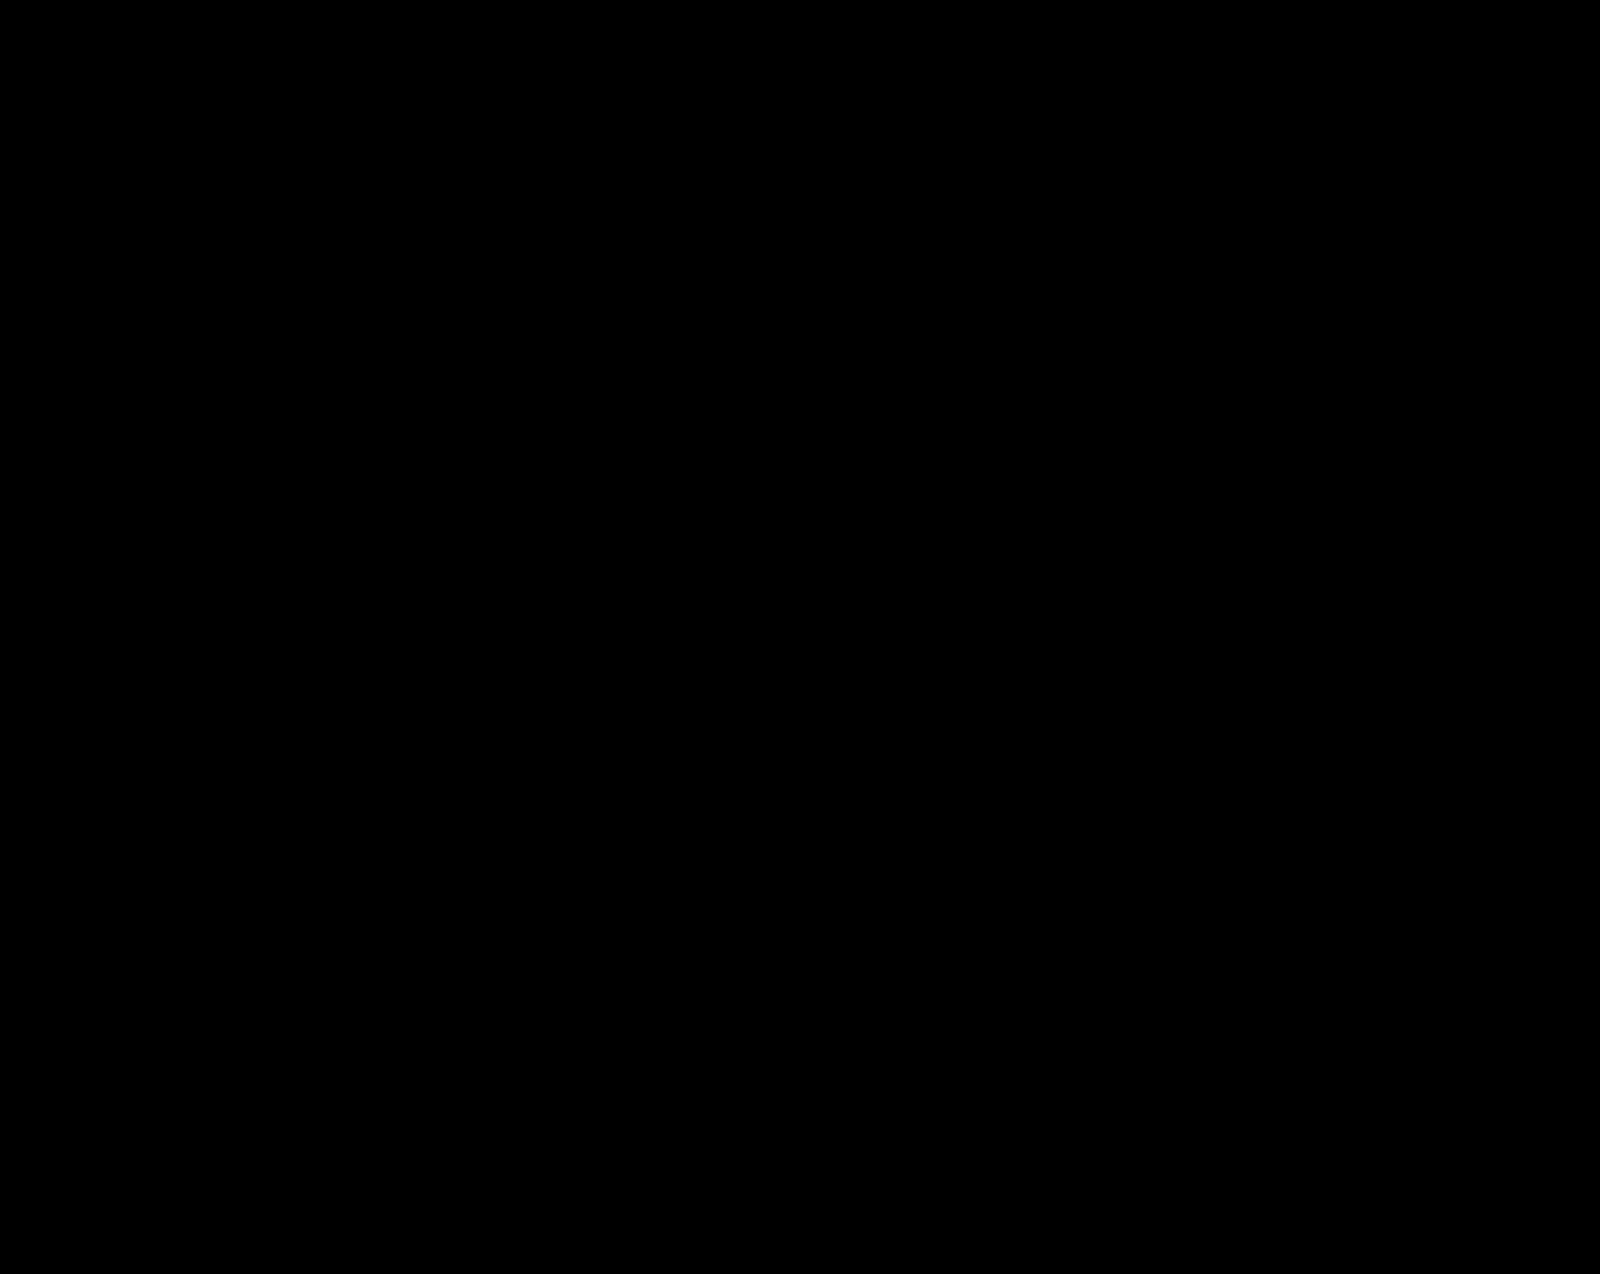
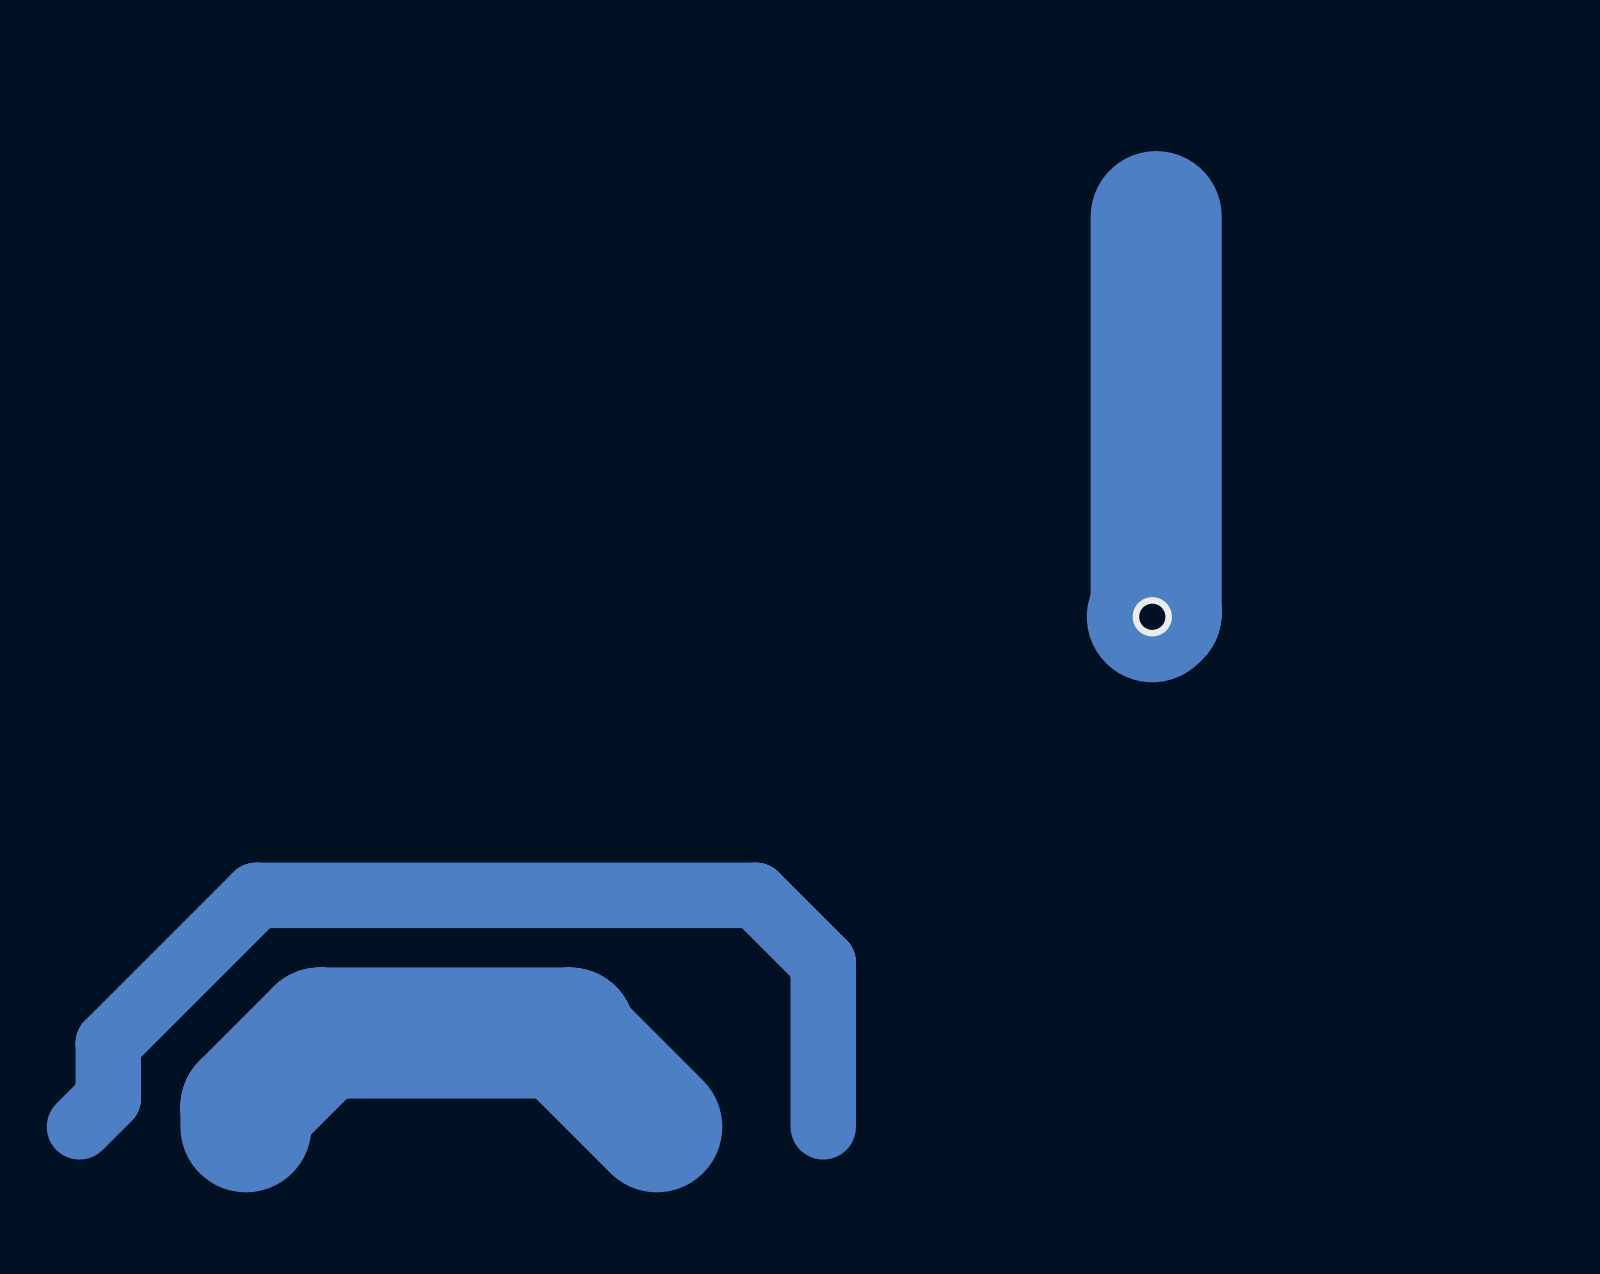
track: none -> (1156, 216) (1156, 612) (1152, 616)
via: none -> (1152, 616)
track: none -> (656, 1126) (569, 1039) (569, 1032) (319, 1032) (245, 1106) (245, 1126)
track: none -> (823, 1126) (823, 963) (755, 895) (256, 895) (108, 1043) (108, 1098) (79, 1126)

